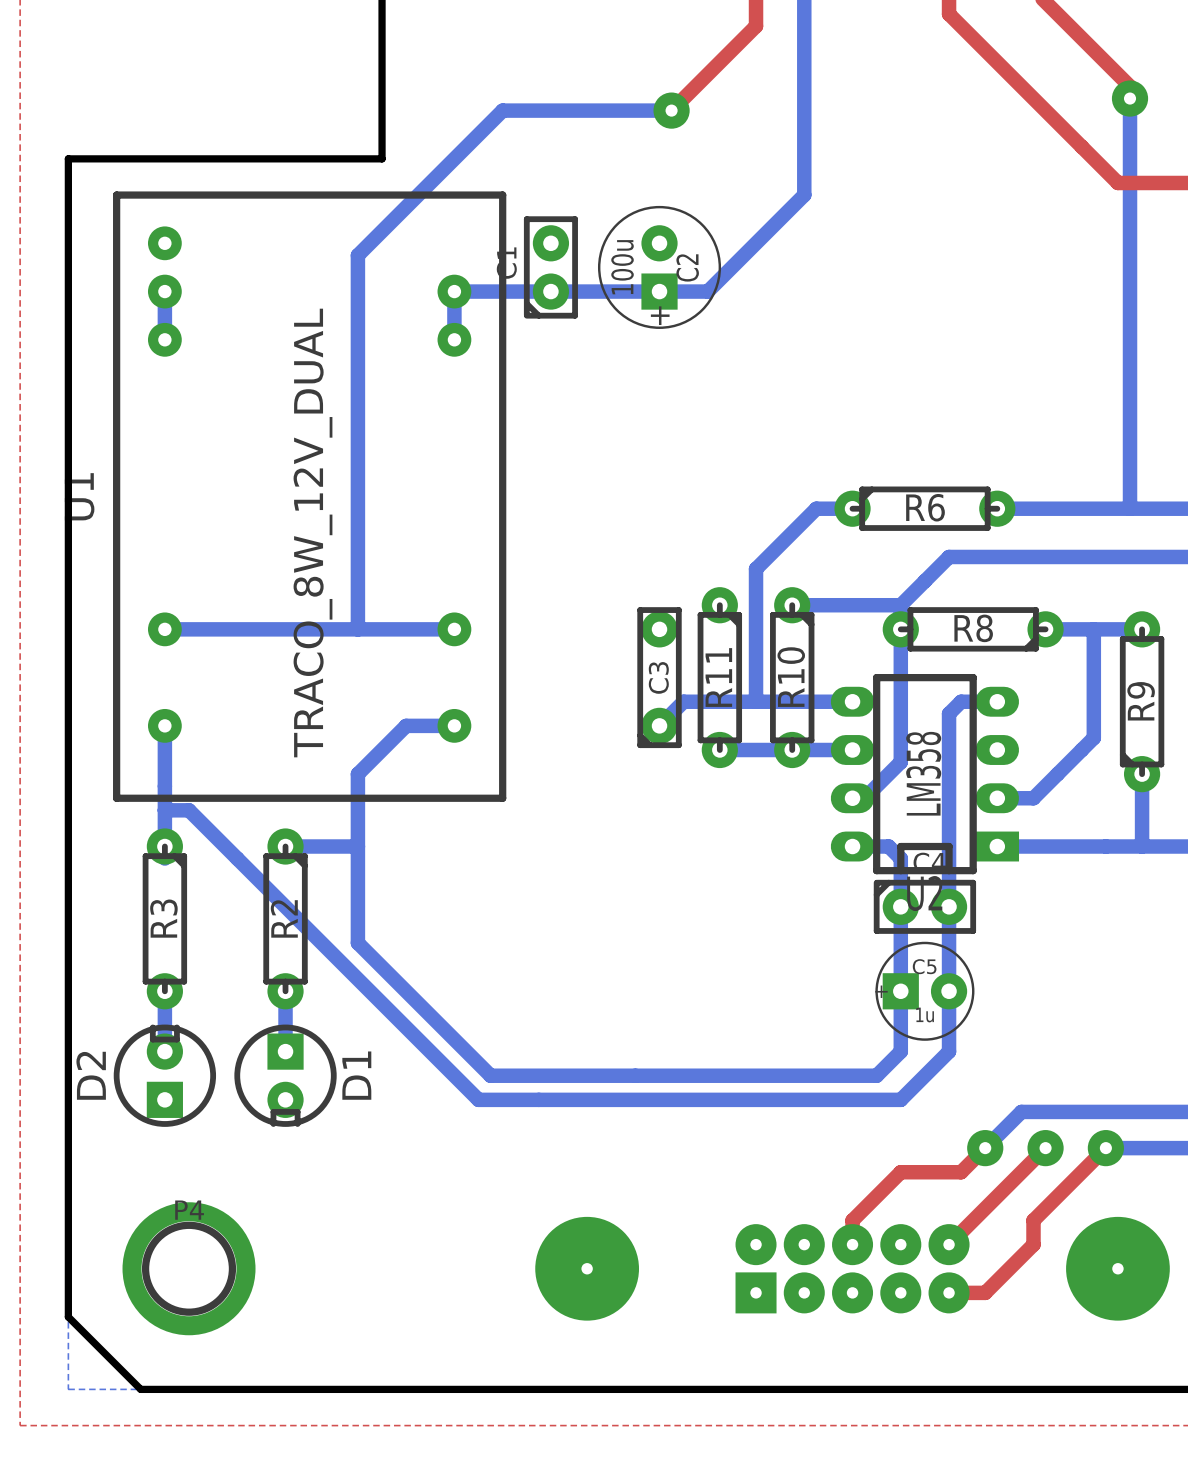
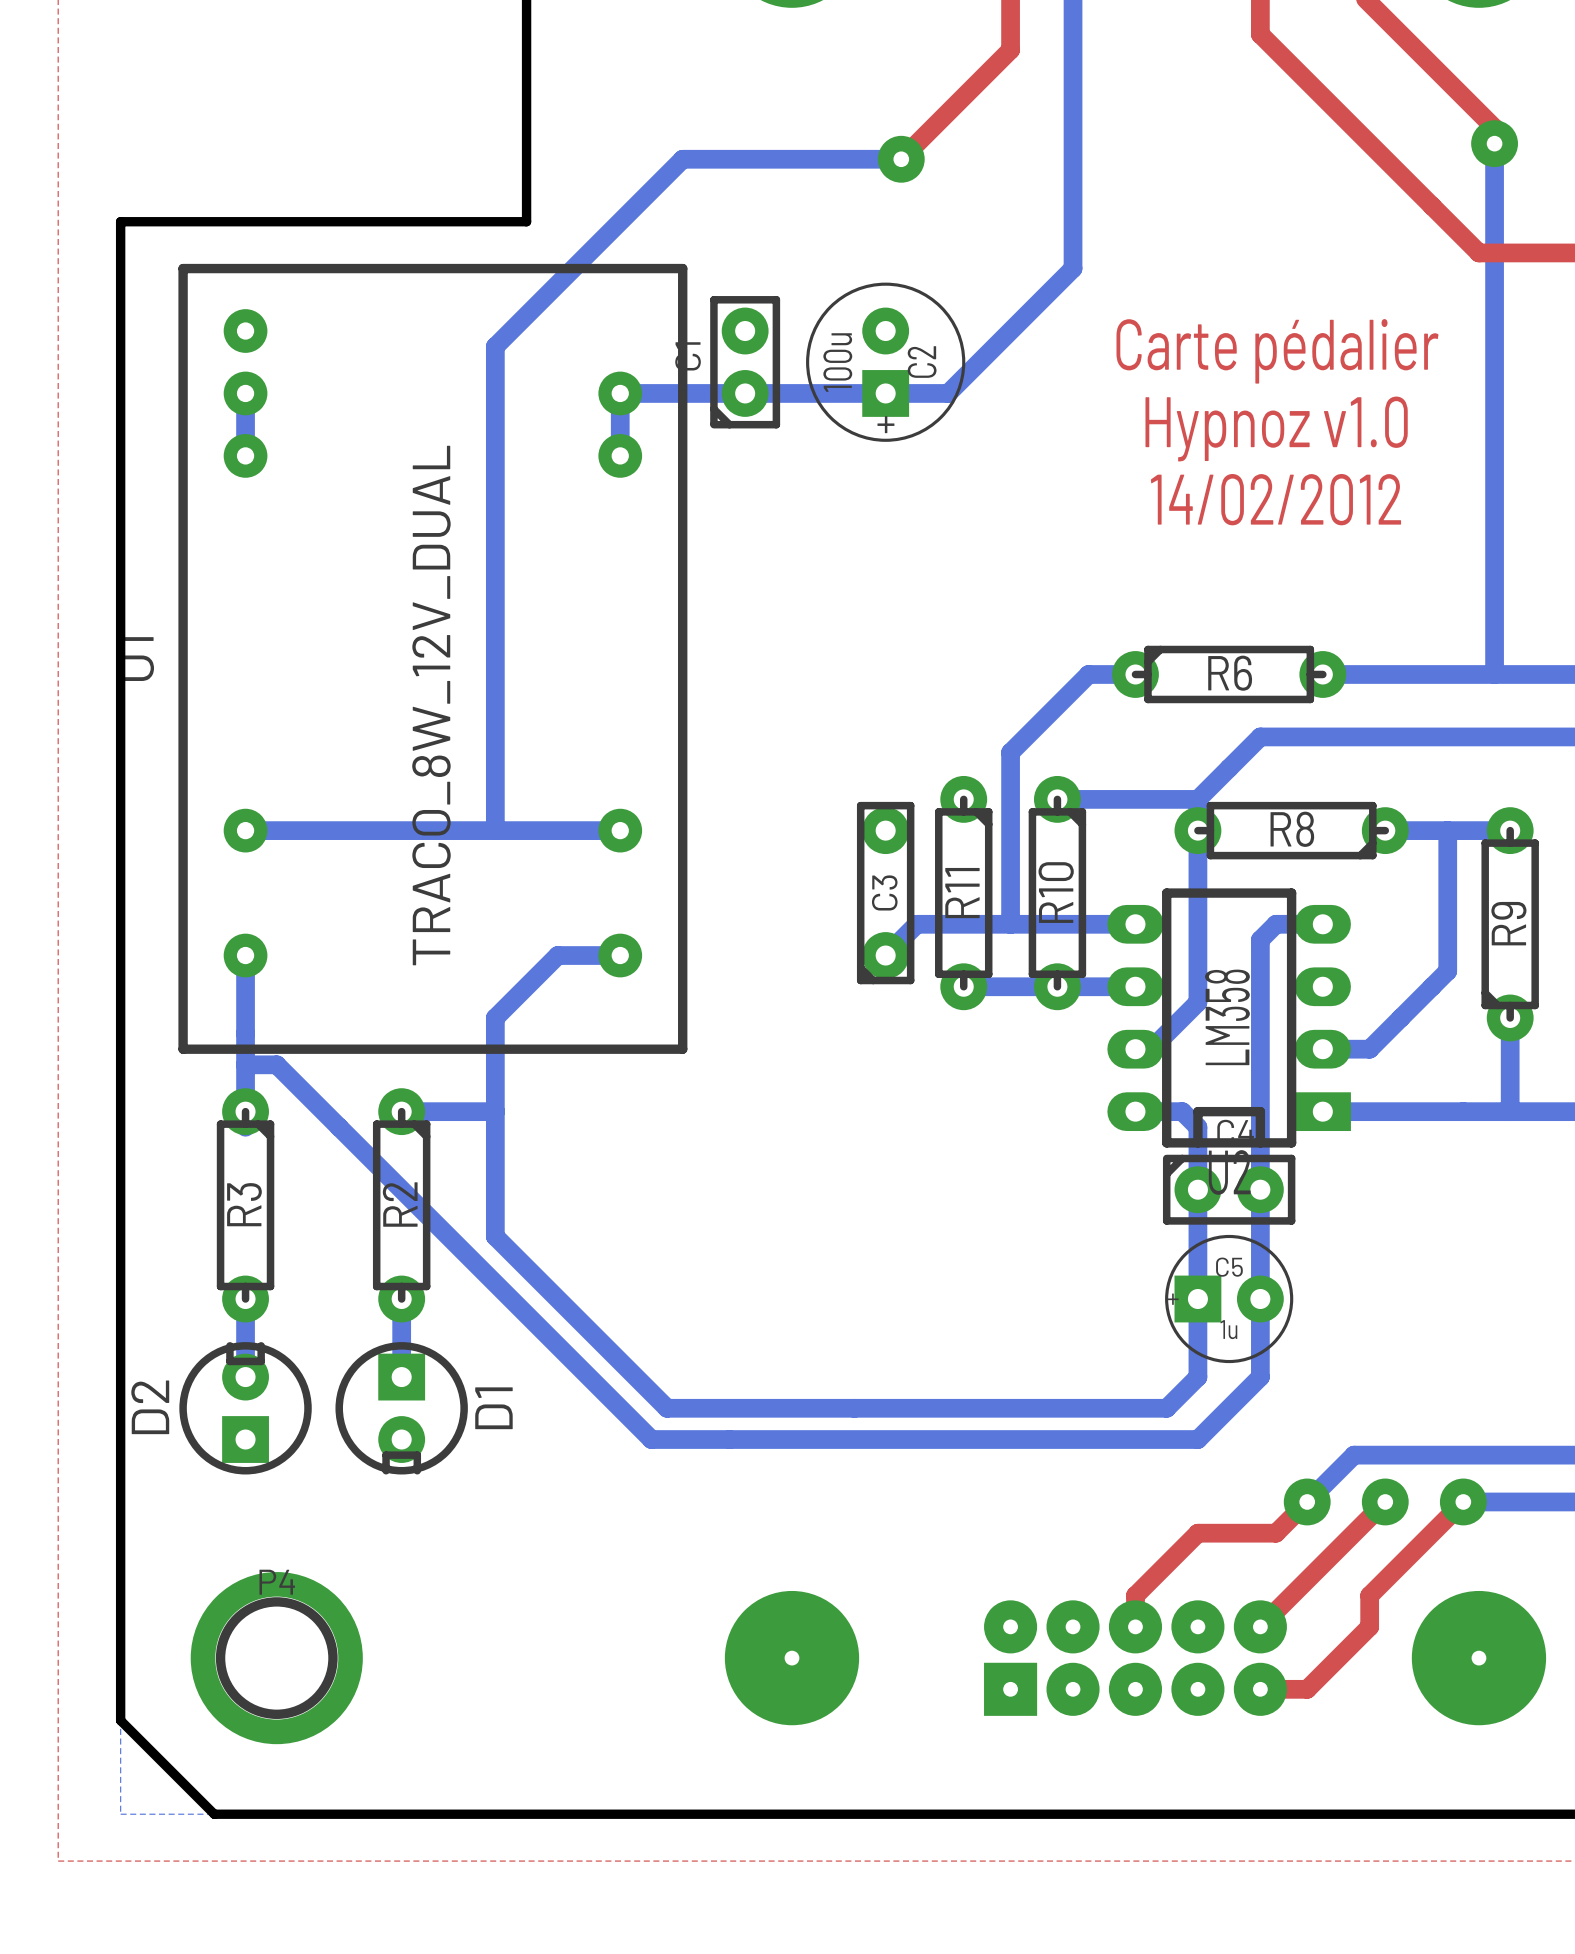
text: none -> Carte pédalier (1277, 351)
text: none -> Hypnoz v1.0 (1276, 429)
text: none -> 14/02/2012 (1275, 499)

